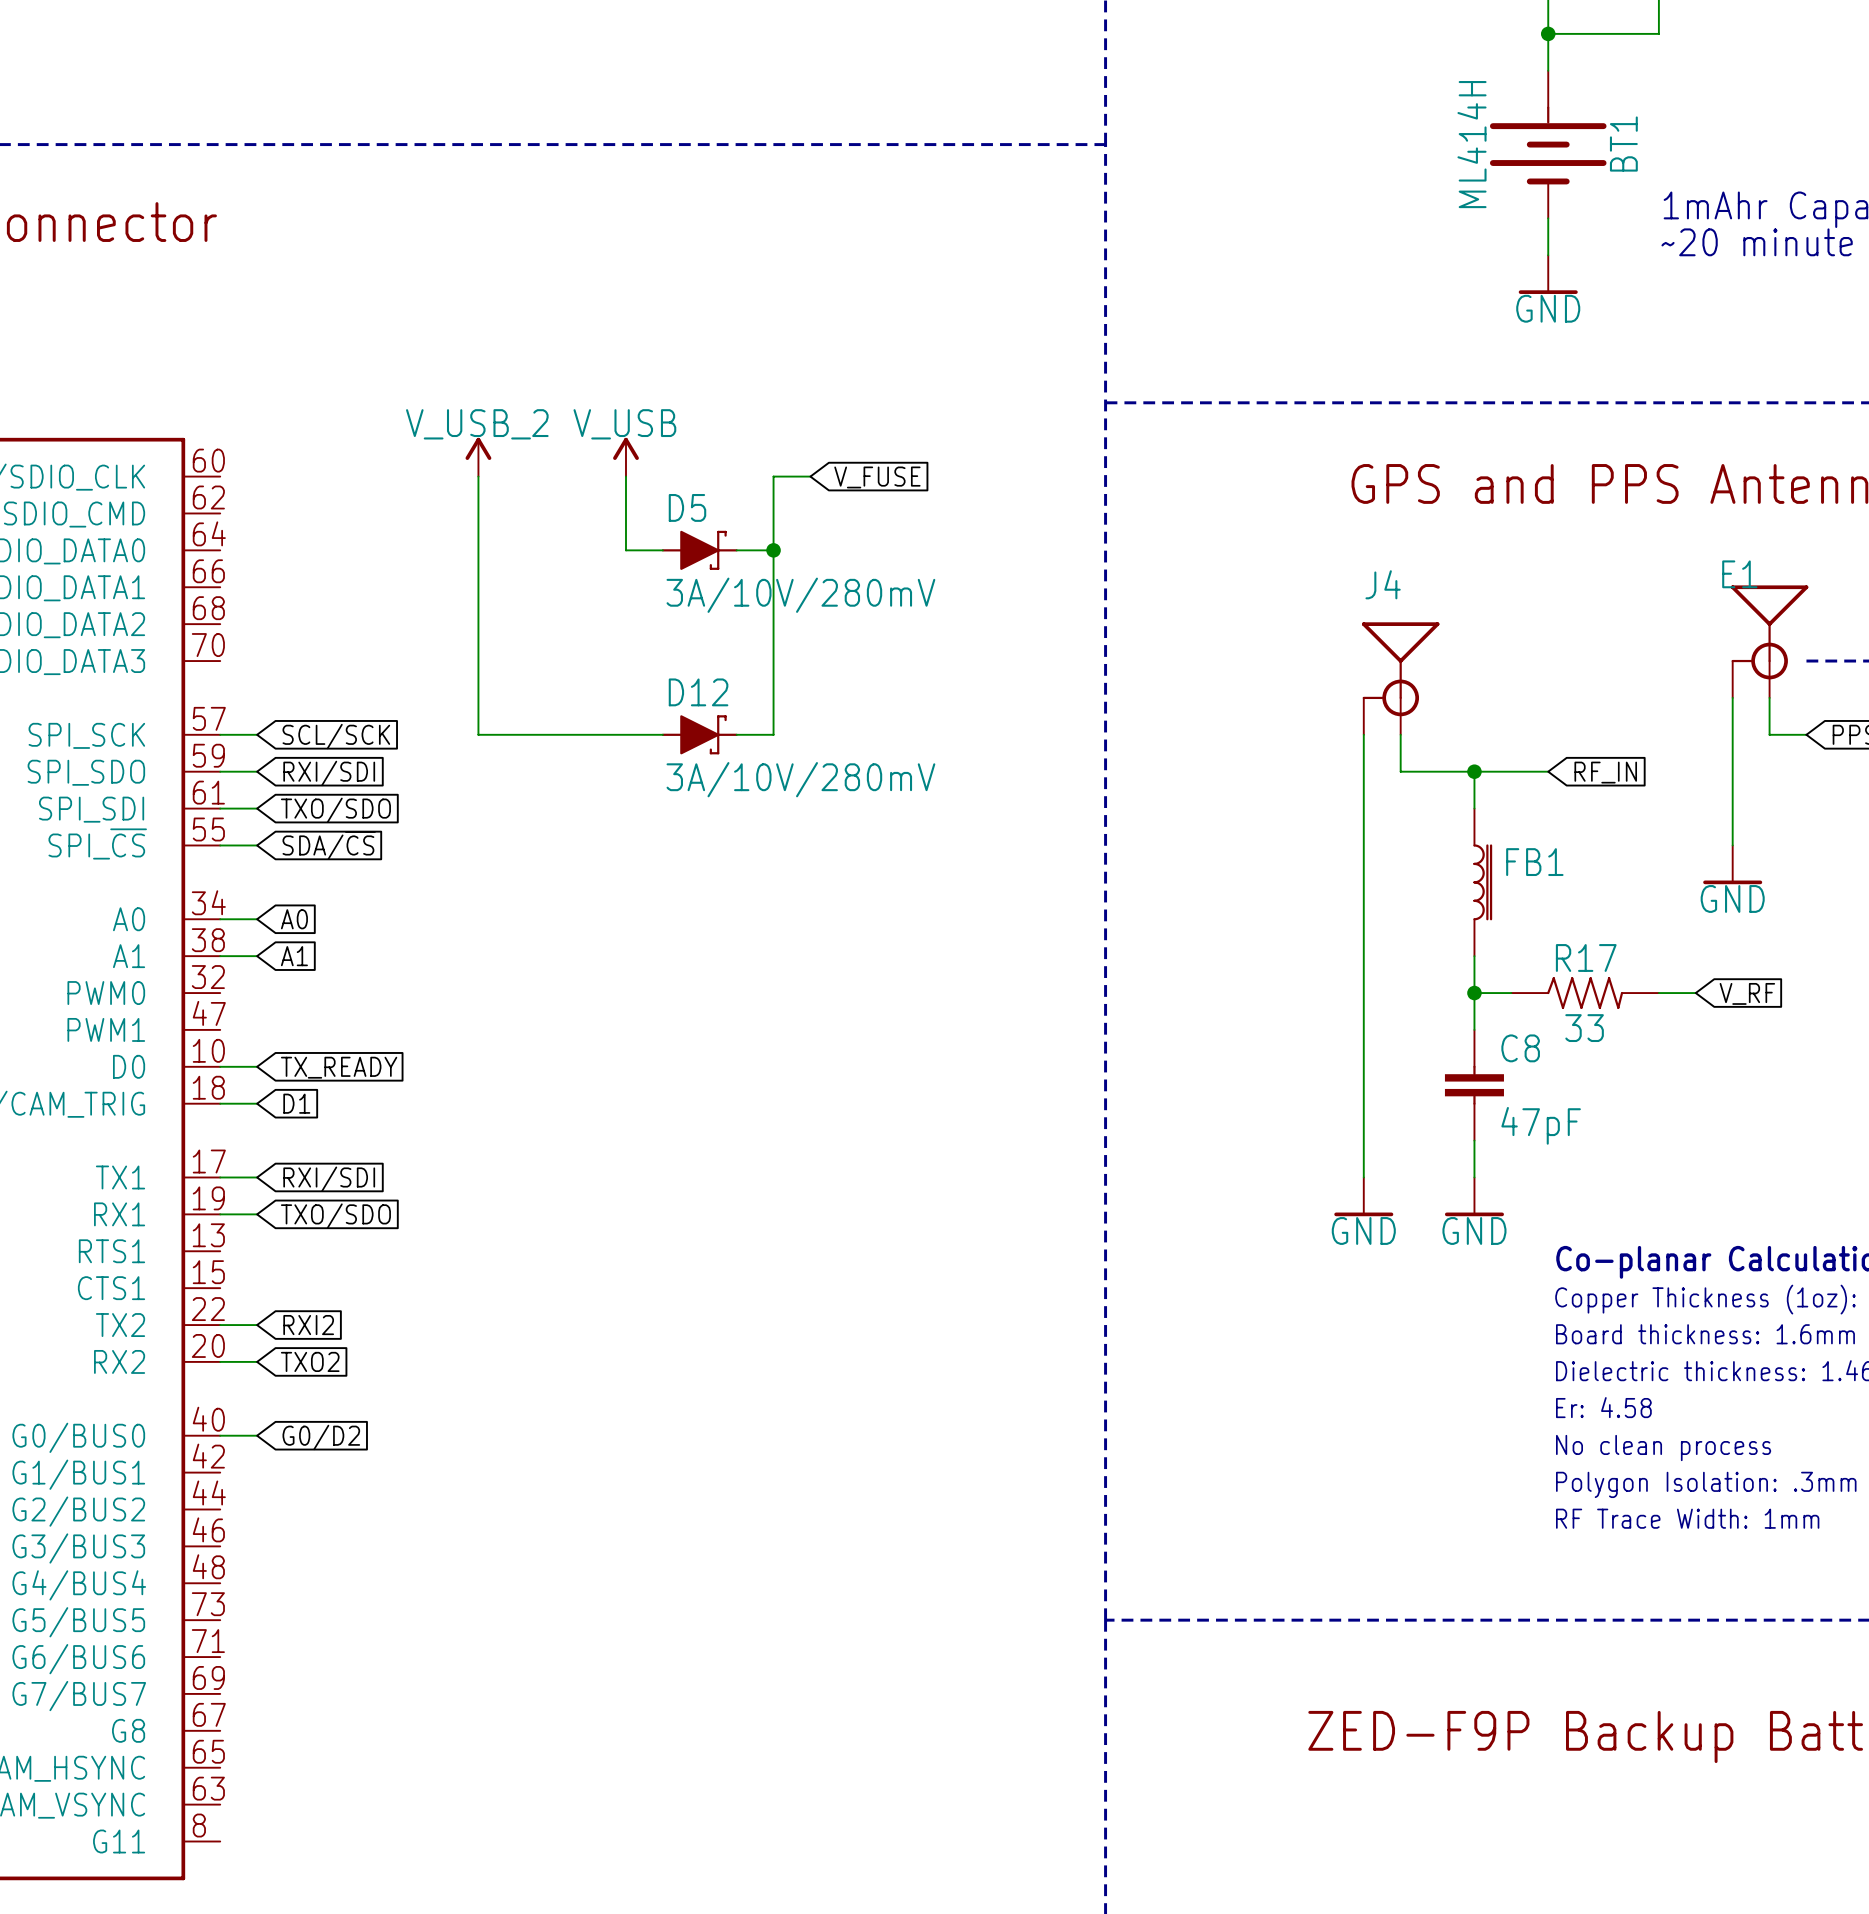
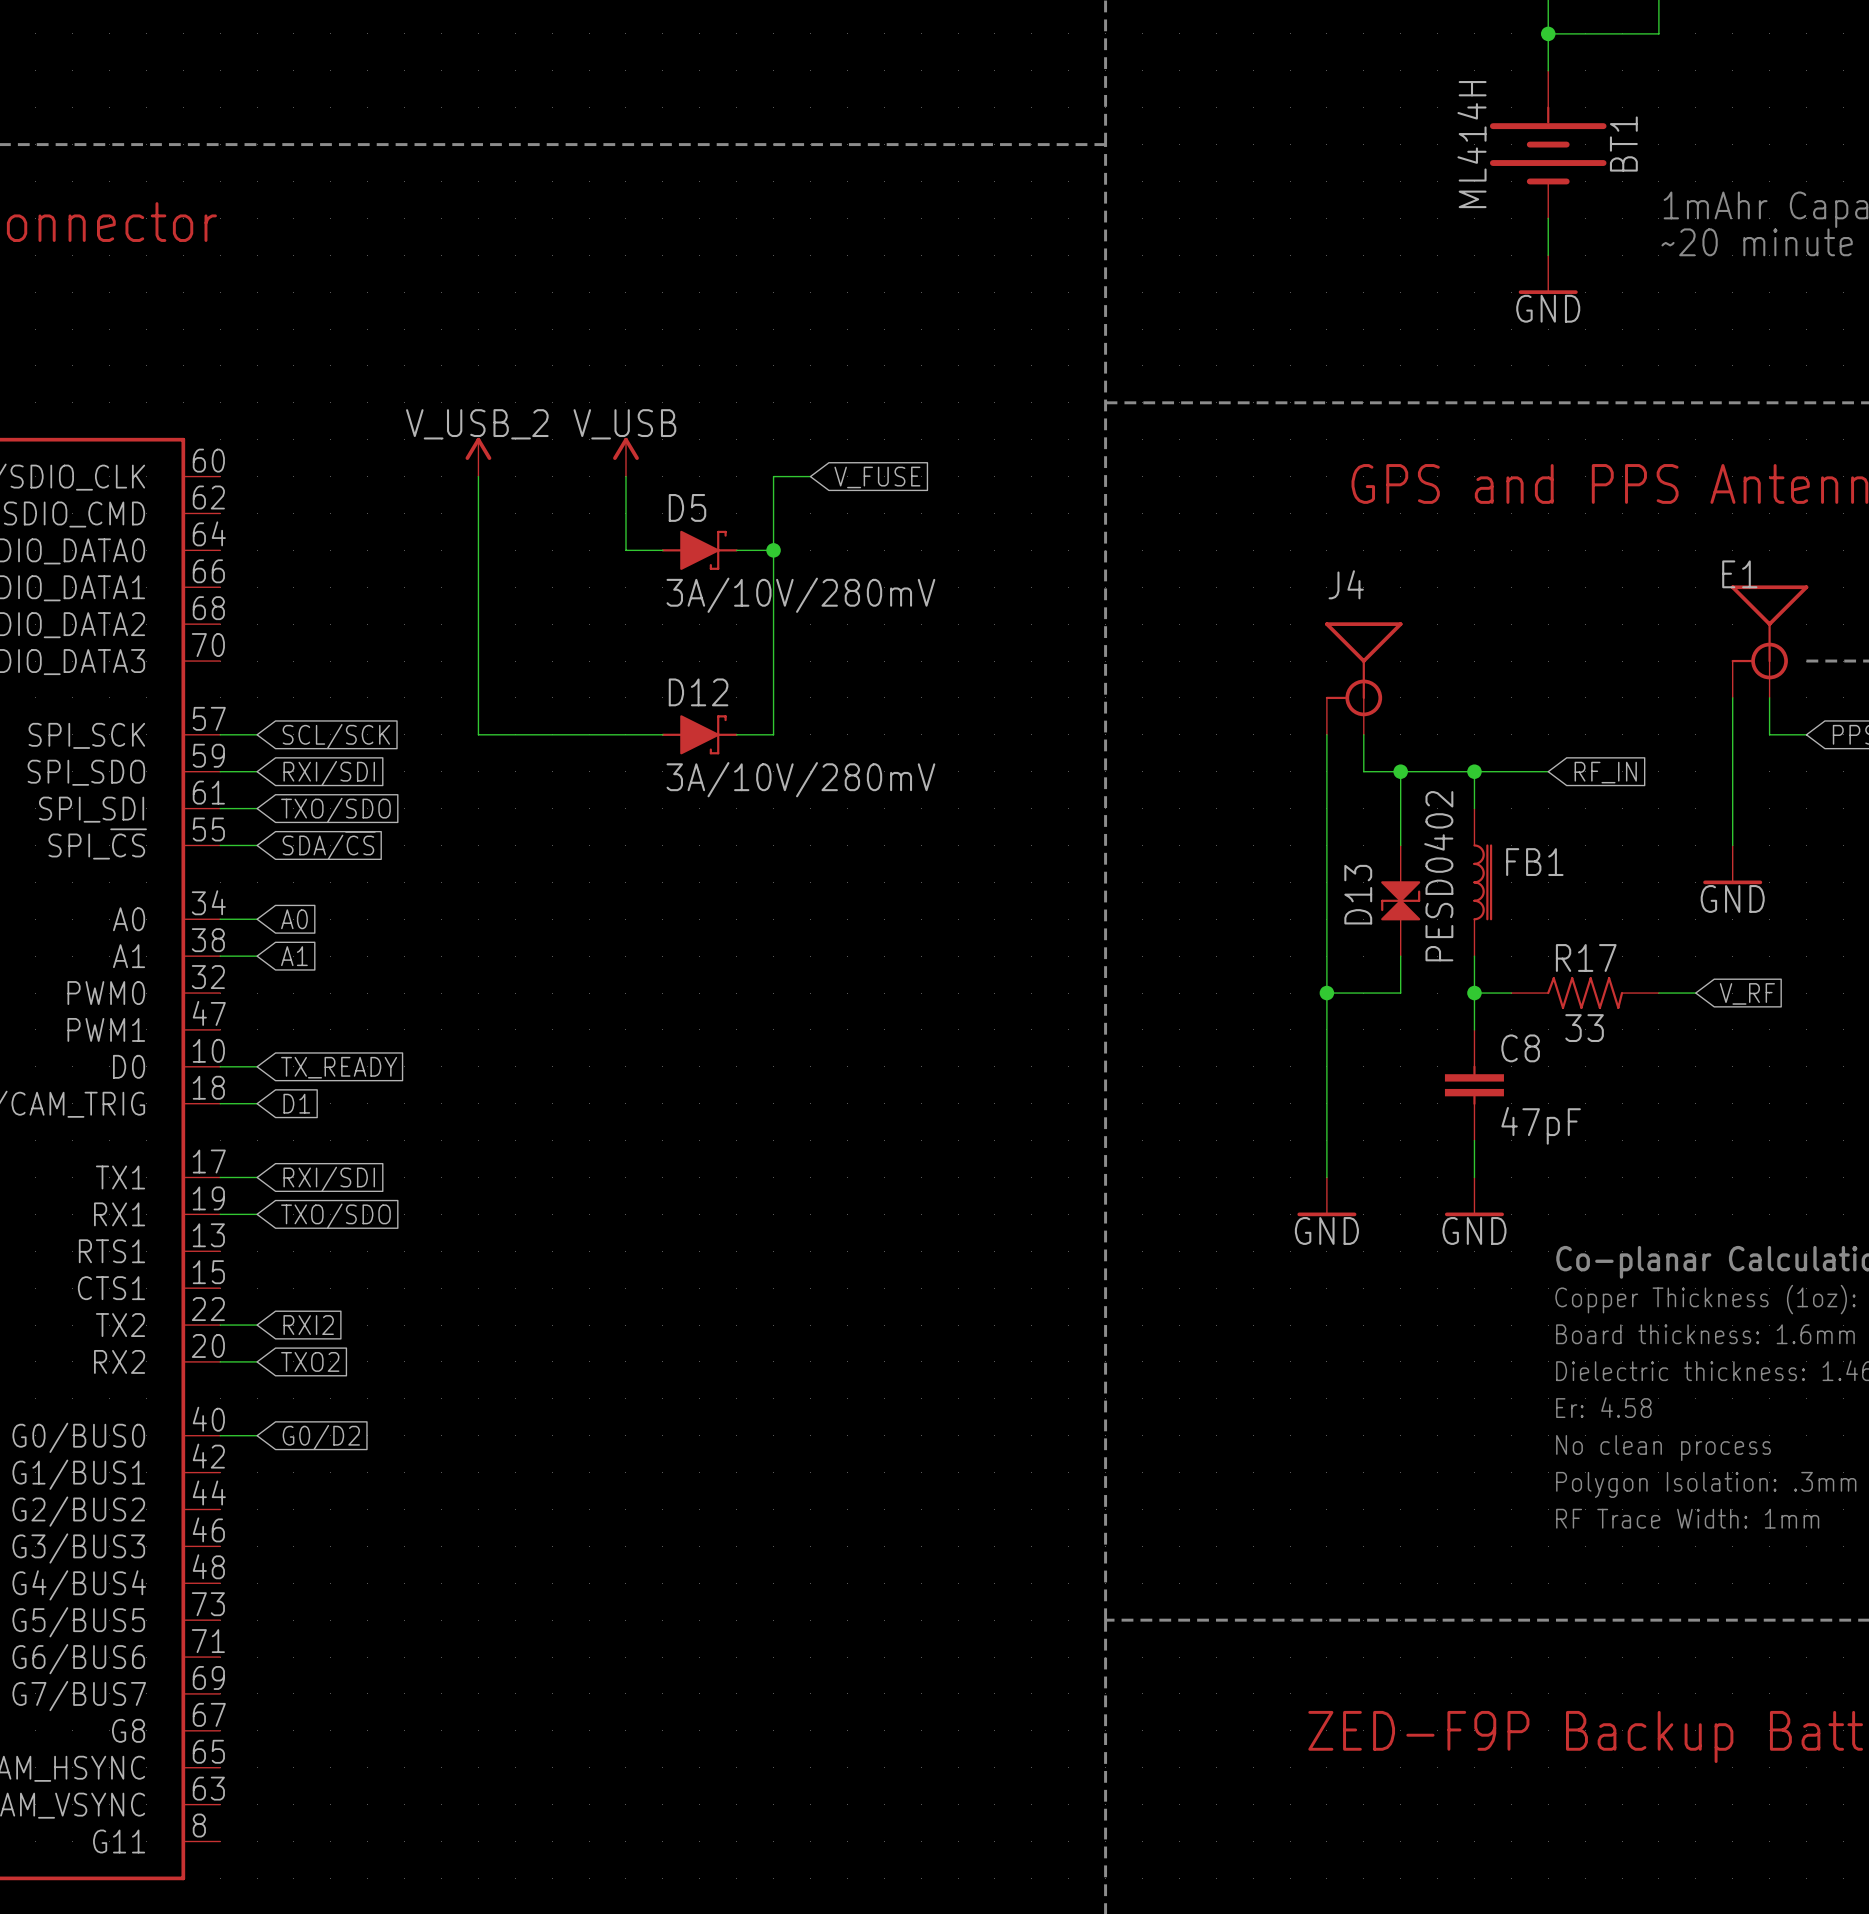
J4 position: (1400, 678) -> (1363, 678)
wire: none -> (1326, 734) (1326, 1177)
wire: (1400, 734) (1400, 771) -> none
wire: (1363, 771) (1363, 1177) -> (1363, 771) (1400, 771) (1400, 845)
junction: none -> (1400, 771)
D13: none -> PESD0402 (1400, 900)
wire: none -> (1400, 956) (1400, 993) (1326, 993)
junction: none -> (1326, 993)
power symbol position: GND (1363, 1196) -> GND (1326, 1196)

